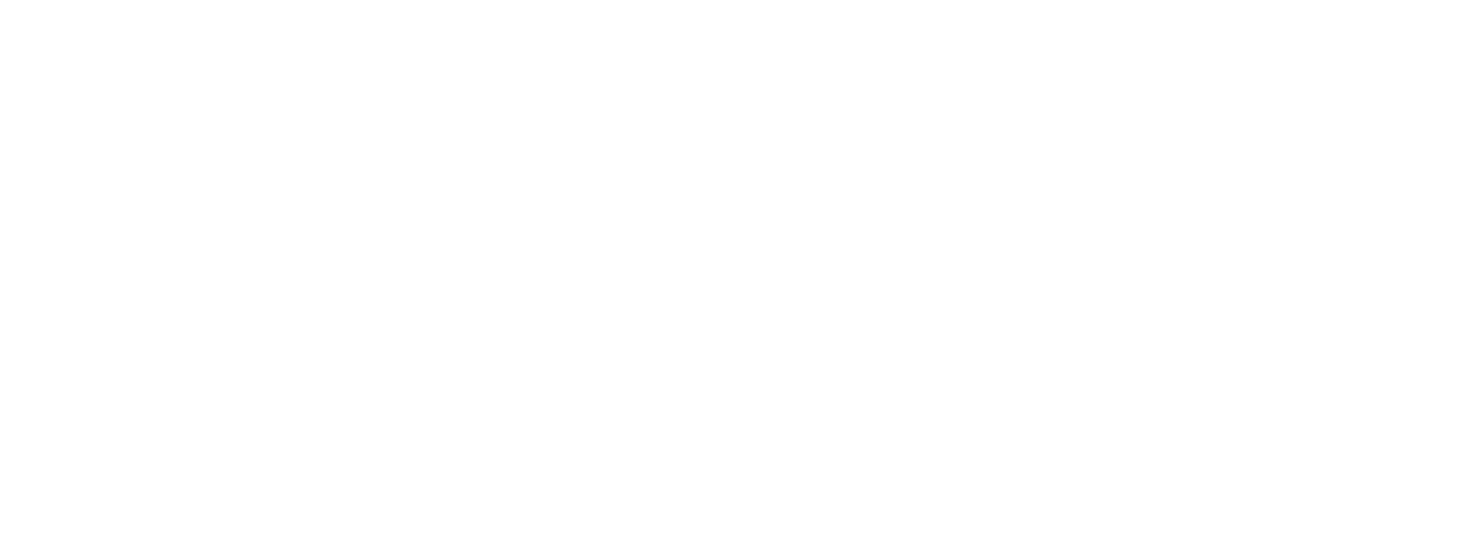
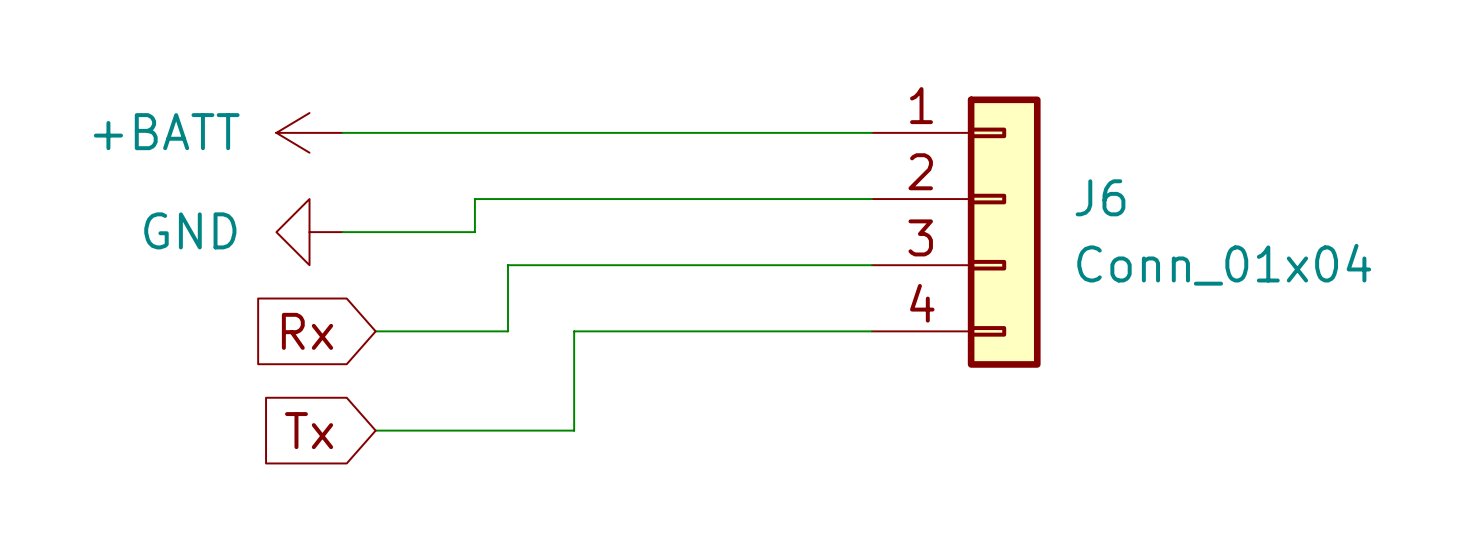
power symbol: none -> +BATT (309, 132)
wire: none -> (342, 132) (871, 132)
wire: none -> (871, 199) (474, 199) (474, 232) (342, 232)
power symbol: none -> GND (309, 232)
J6: none -> Conn_01x04 (956, 232)
wire: none -> (871, 265) (508, 265) (508, 331) (375, 331)
global label: none -> Rx (307, 331)
wire: none -> (871, 331) (574, 331) (574, 430) (375, 430)
global label: none -> Tx (309, 430)

